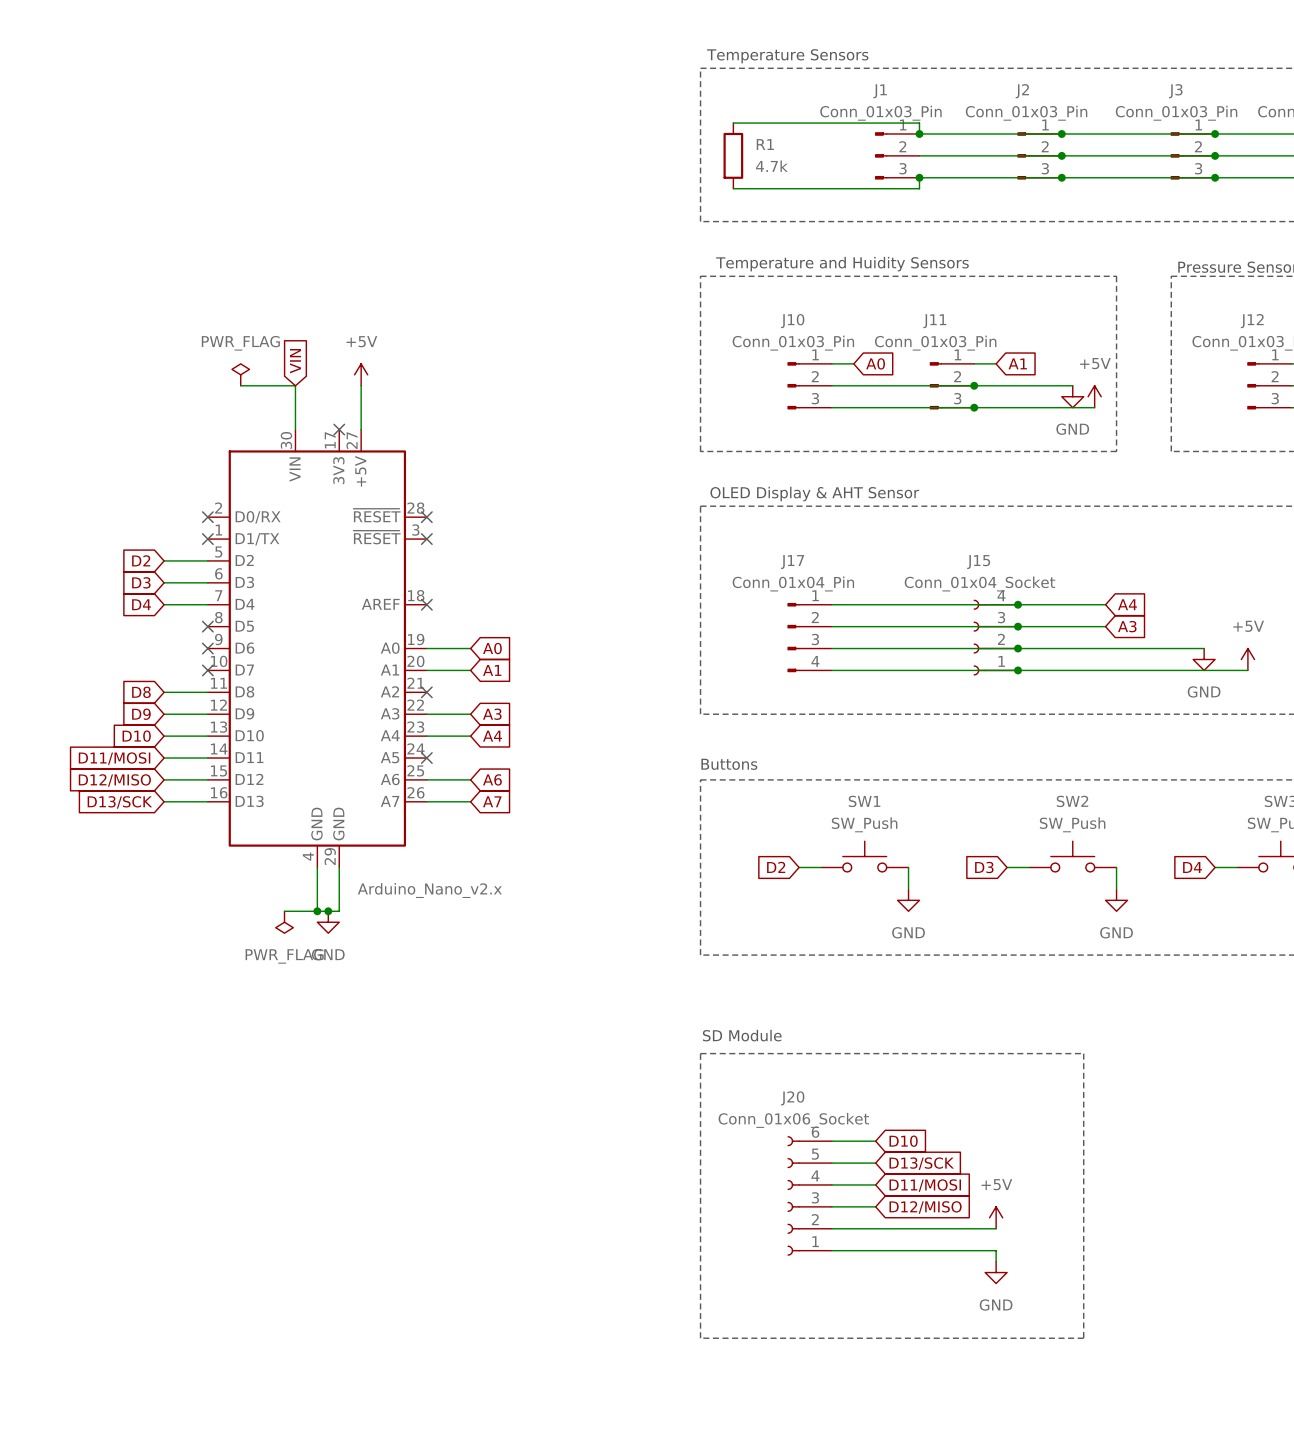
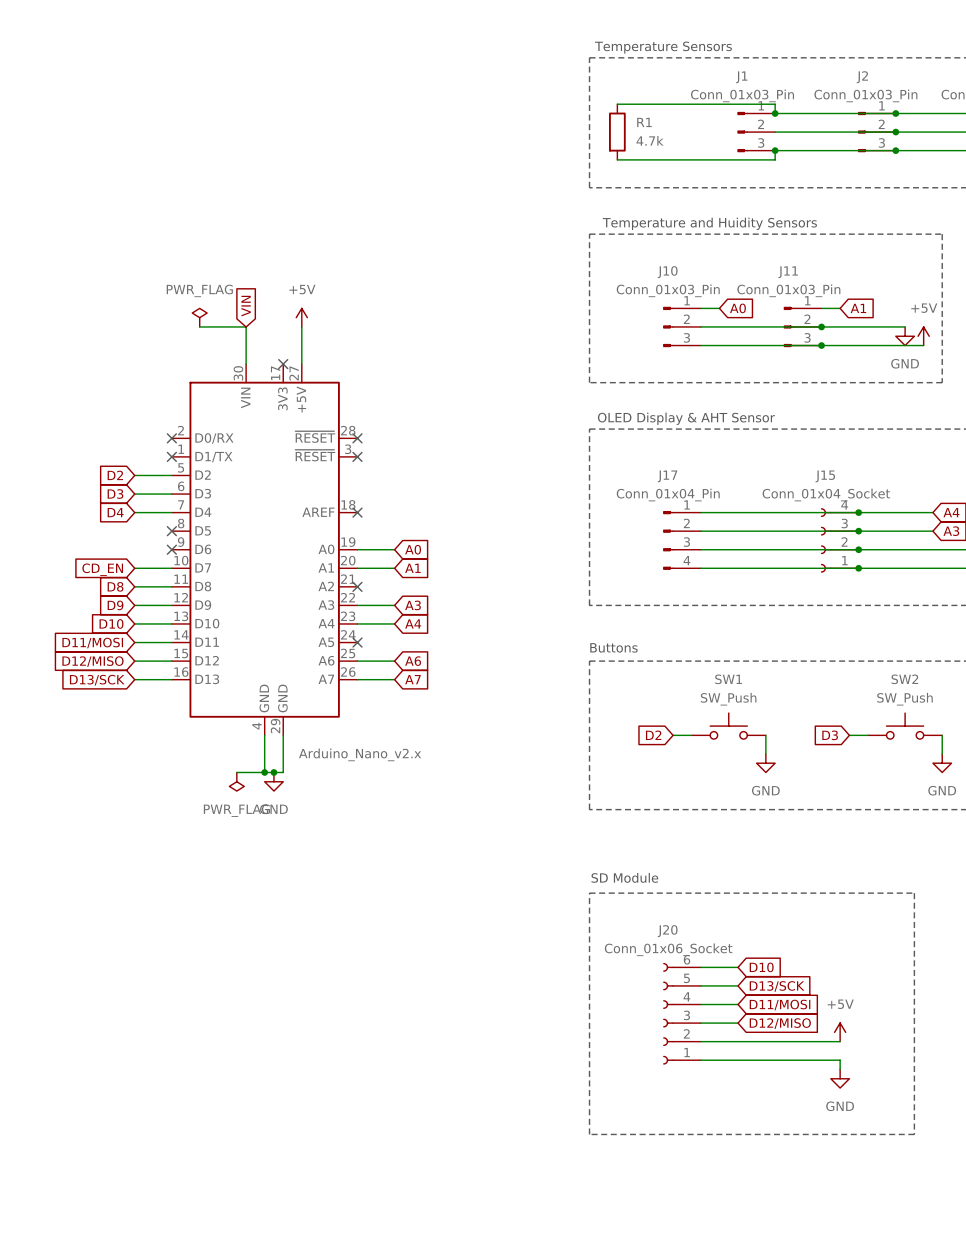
wire: none -> (134, 568) (171, 568)
no-connect mark: (207, 670) -> none
global label: none -> CD_EN (102, 569)

